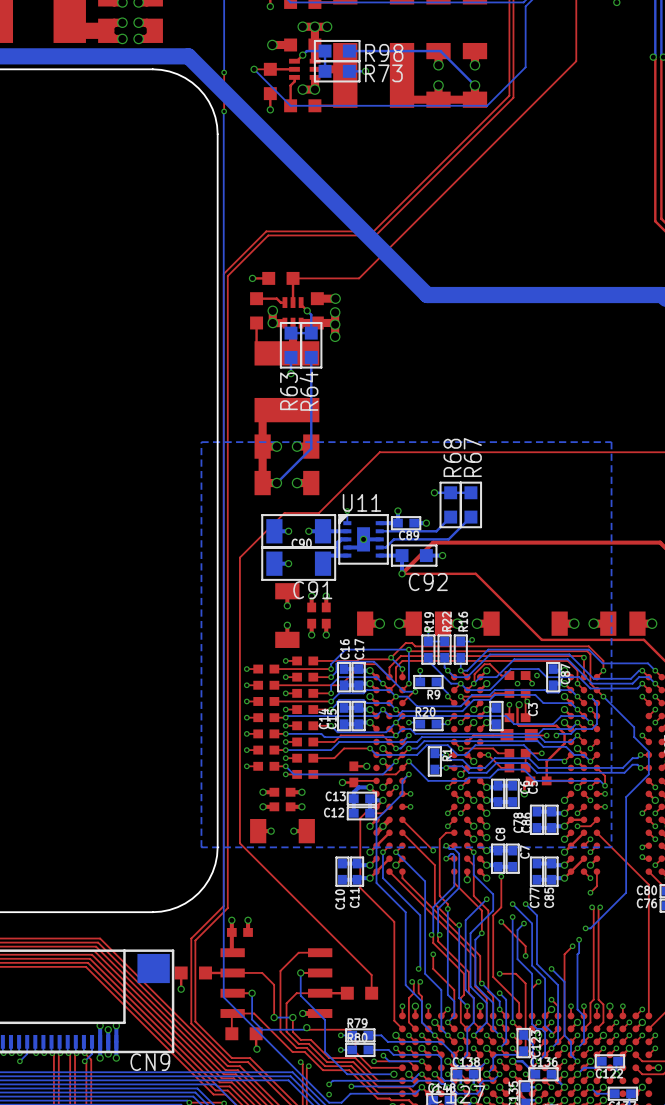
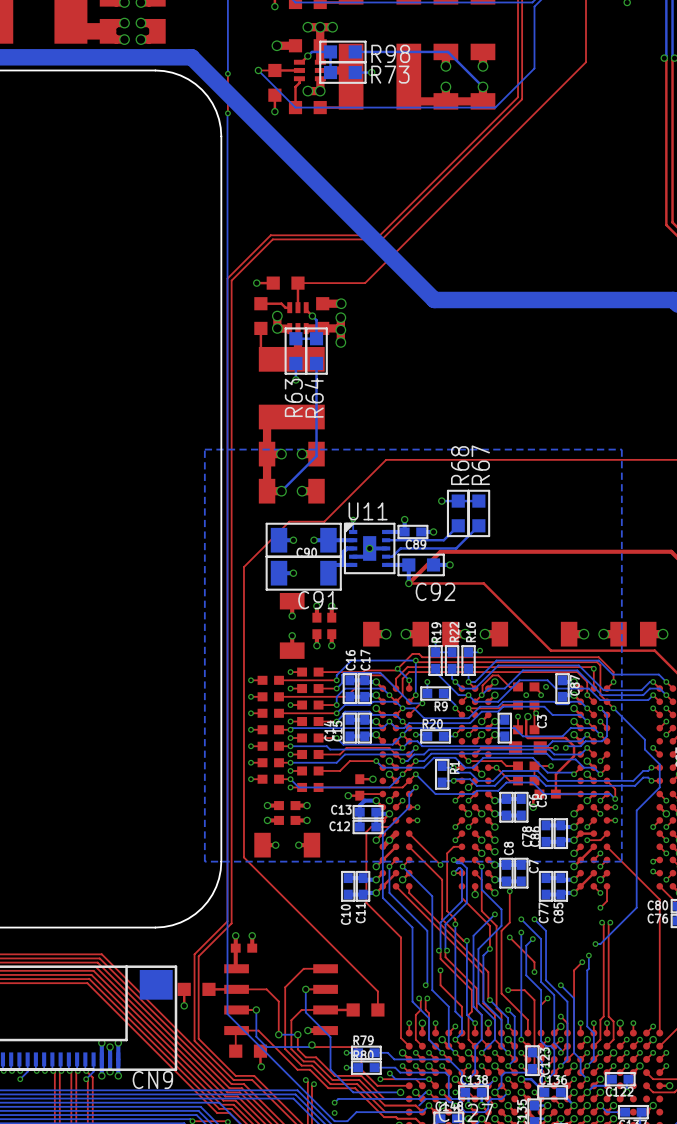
via: (351, 1086) -> none
bottom track: (412, 1086) (351, 1086) -> (419, 1104) (419, 1105)

